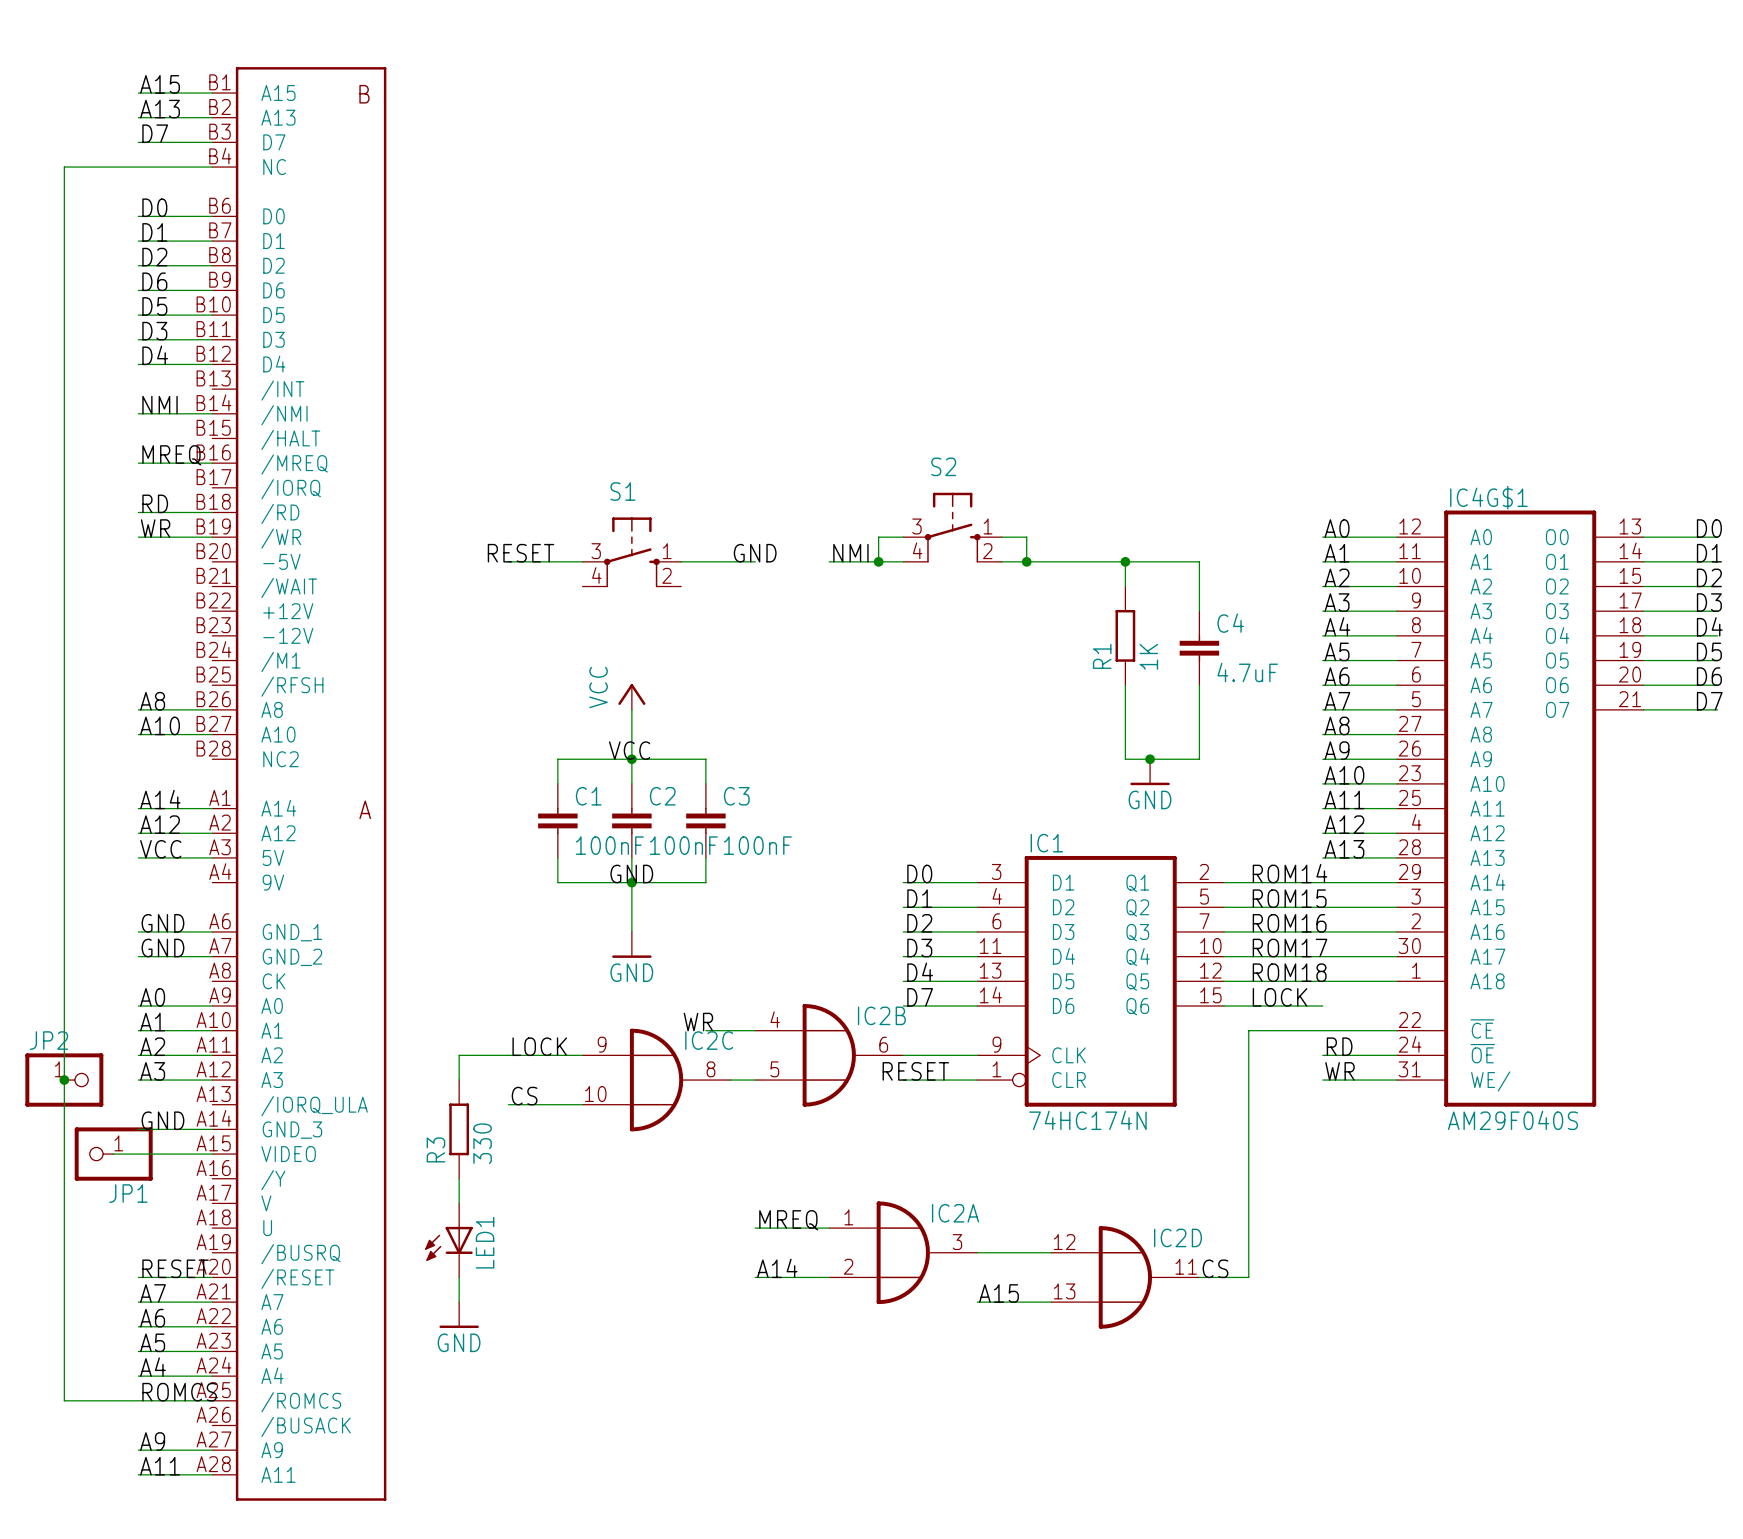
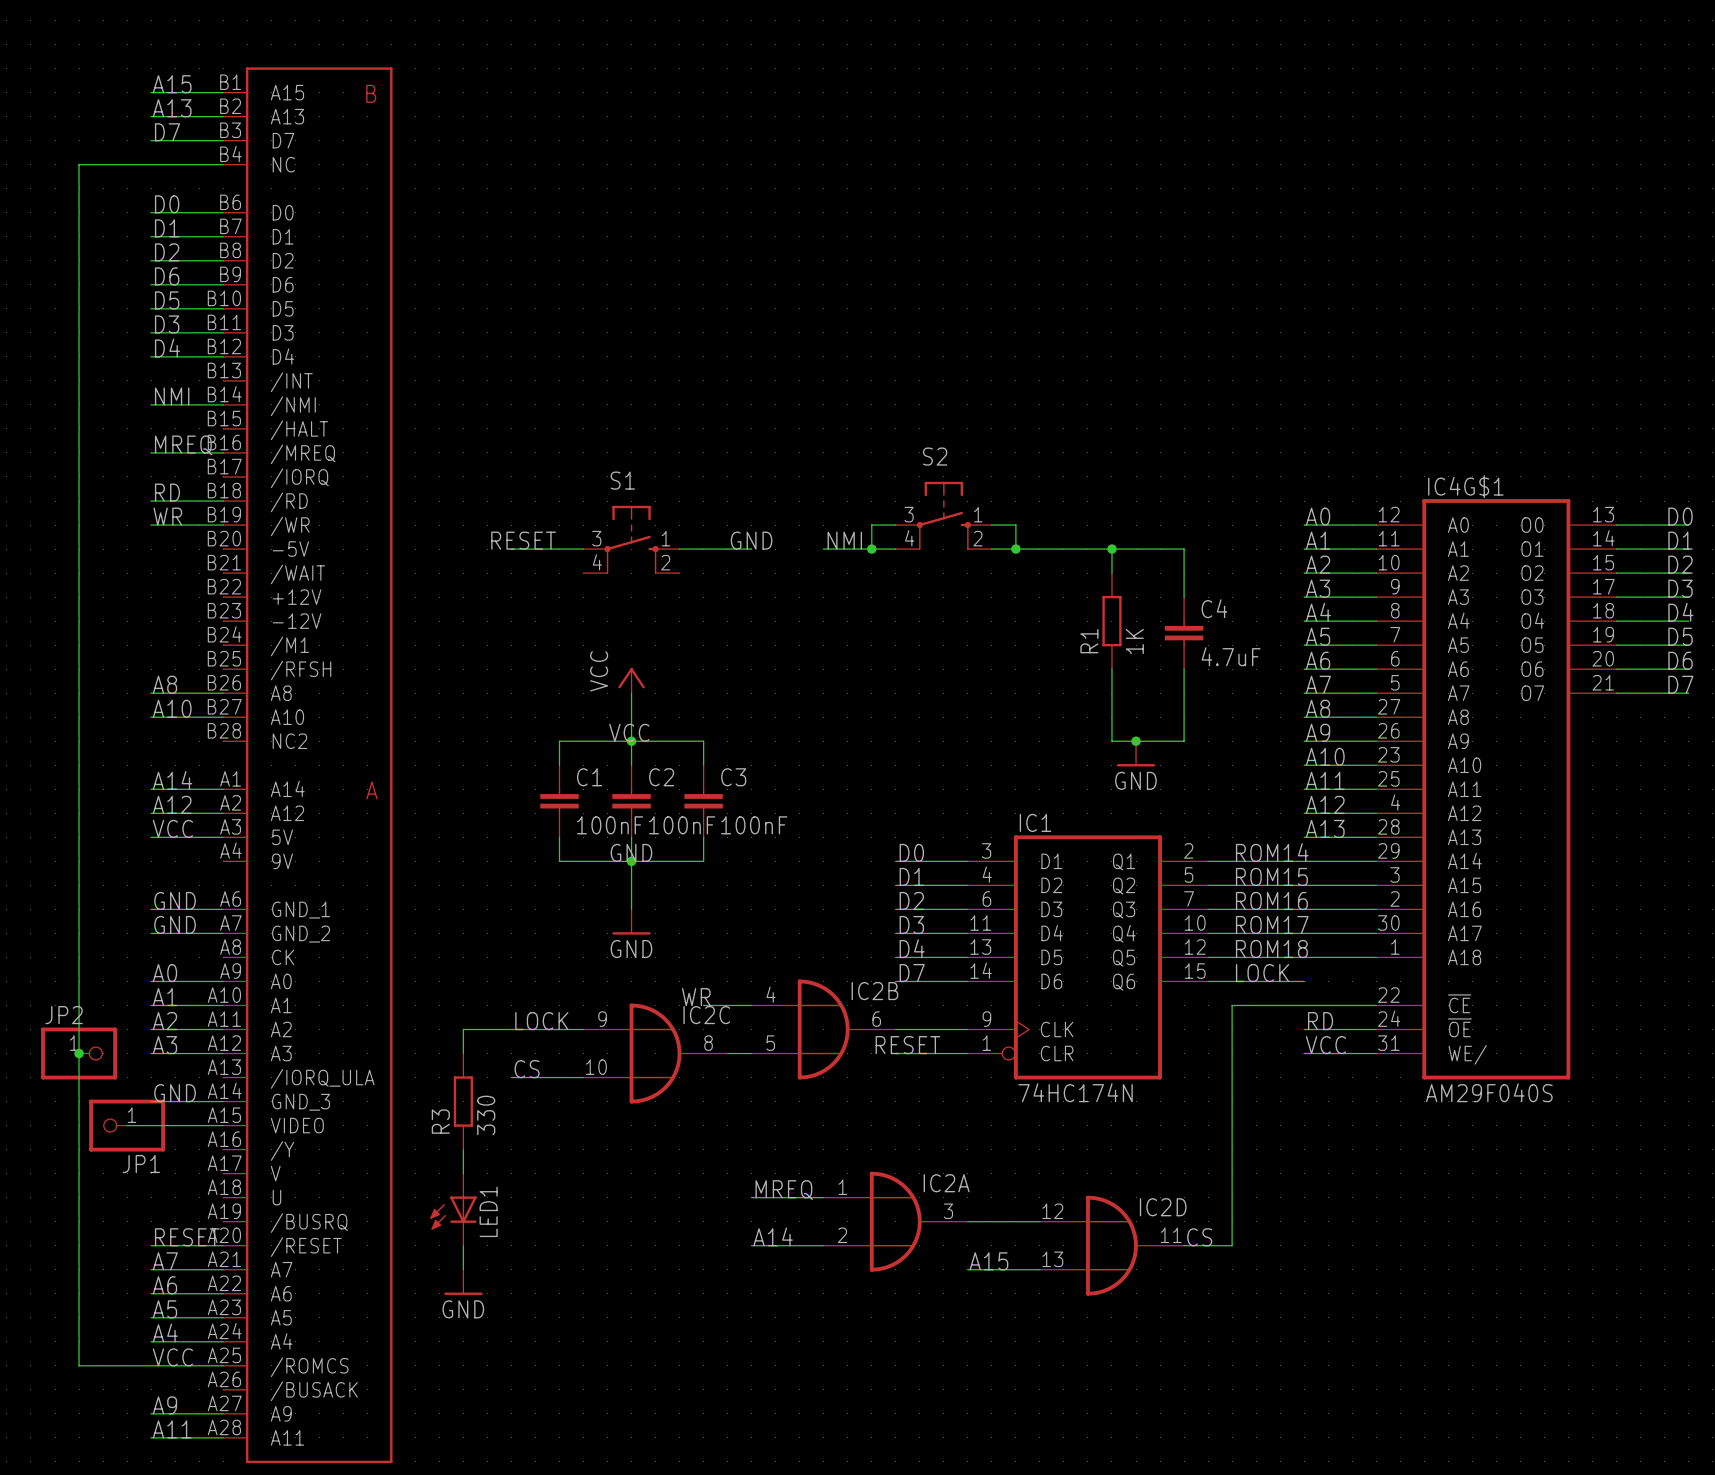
label: WR (1339, 1071) -> VCC (1325, 1045)
label: ROMCS (179, 1392) -> VCC (172, 1357)

